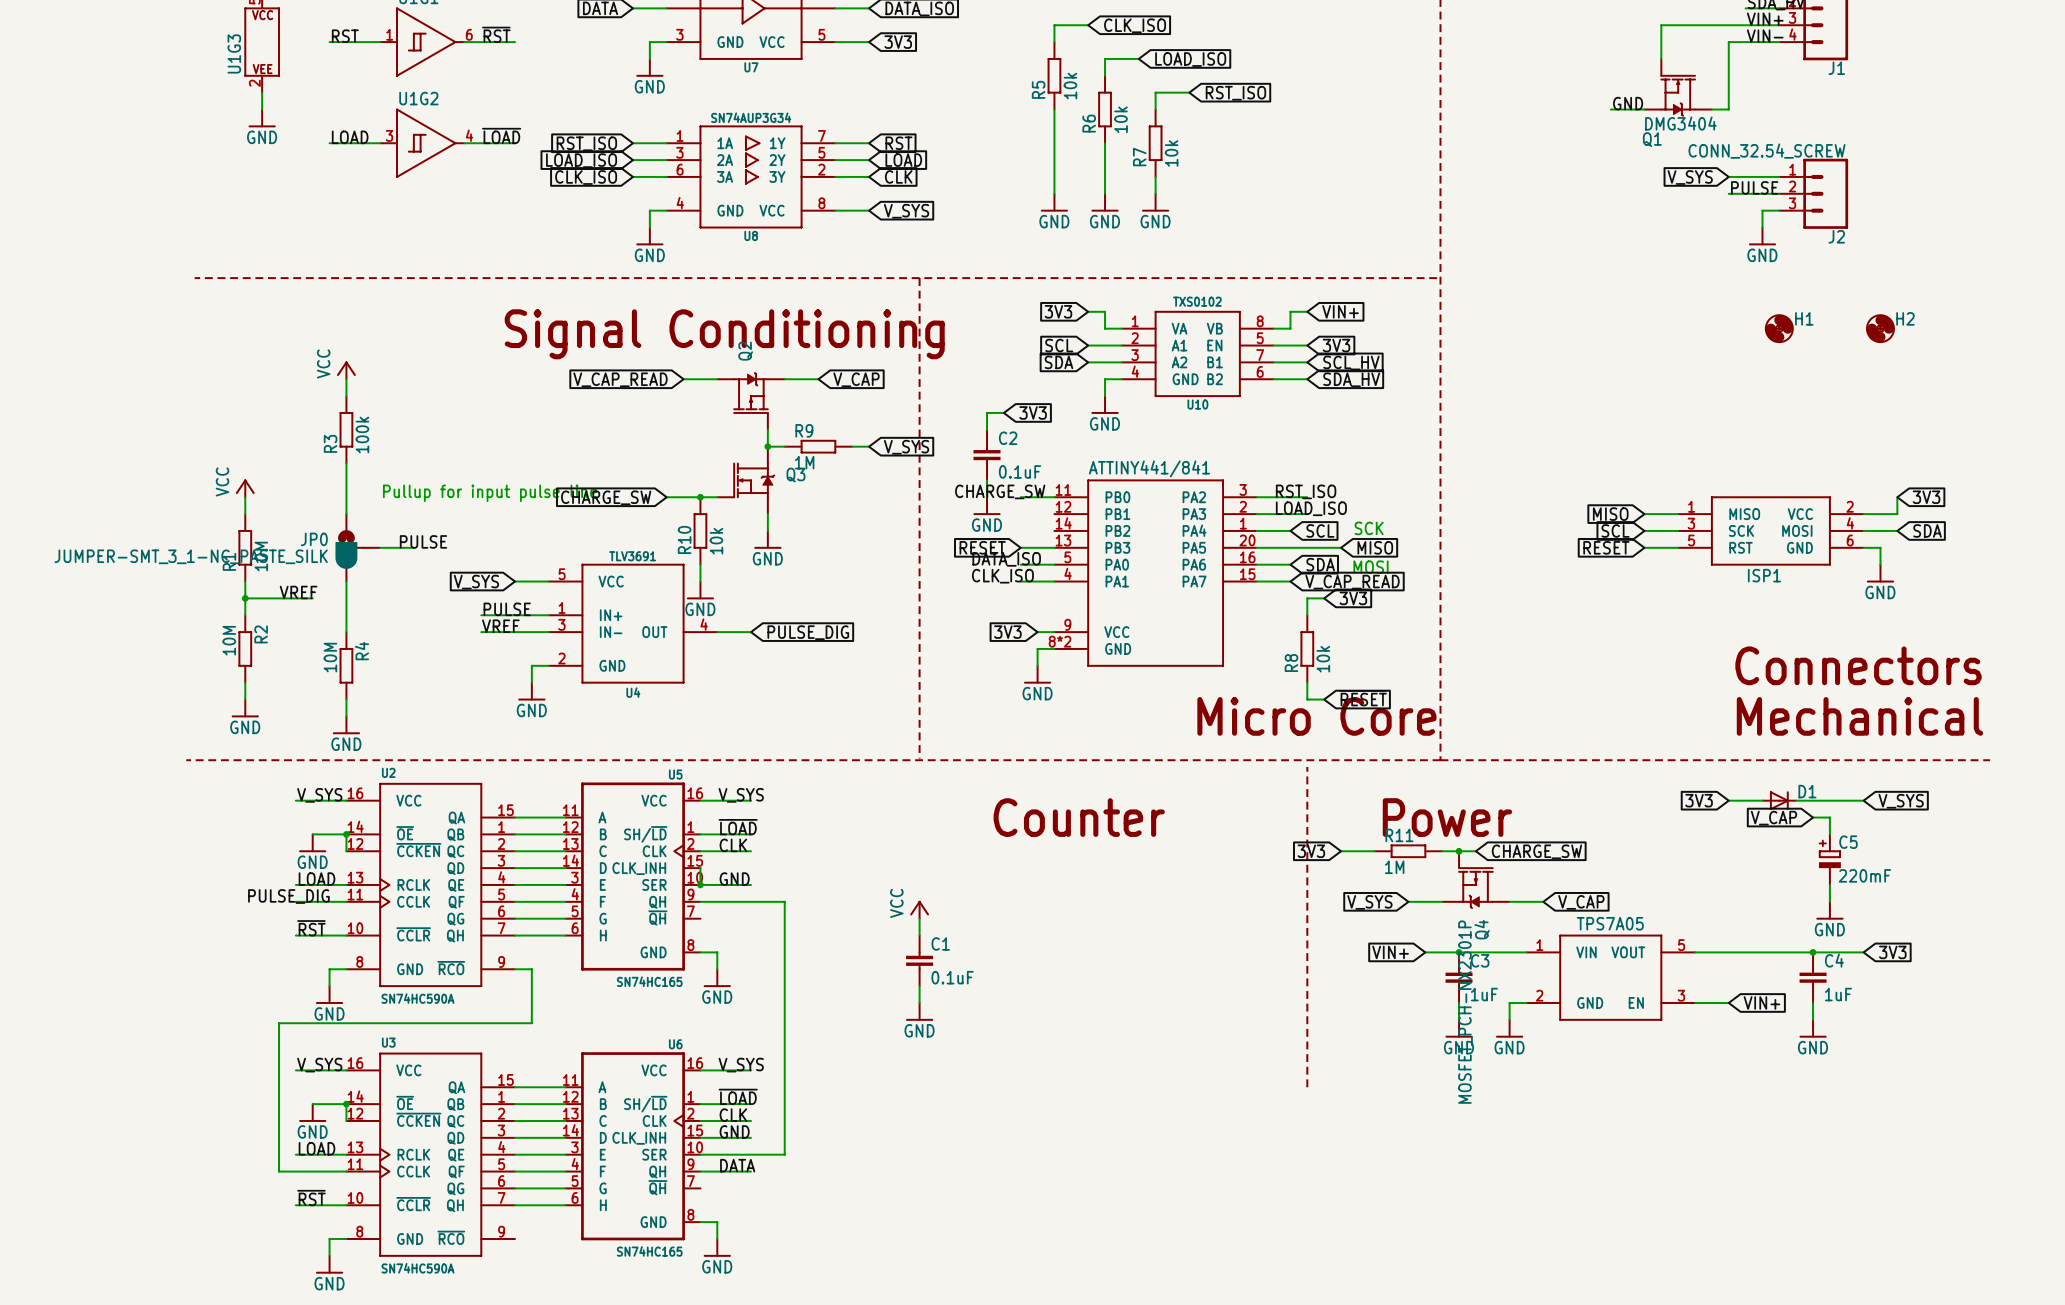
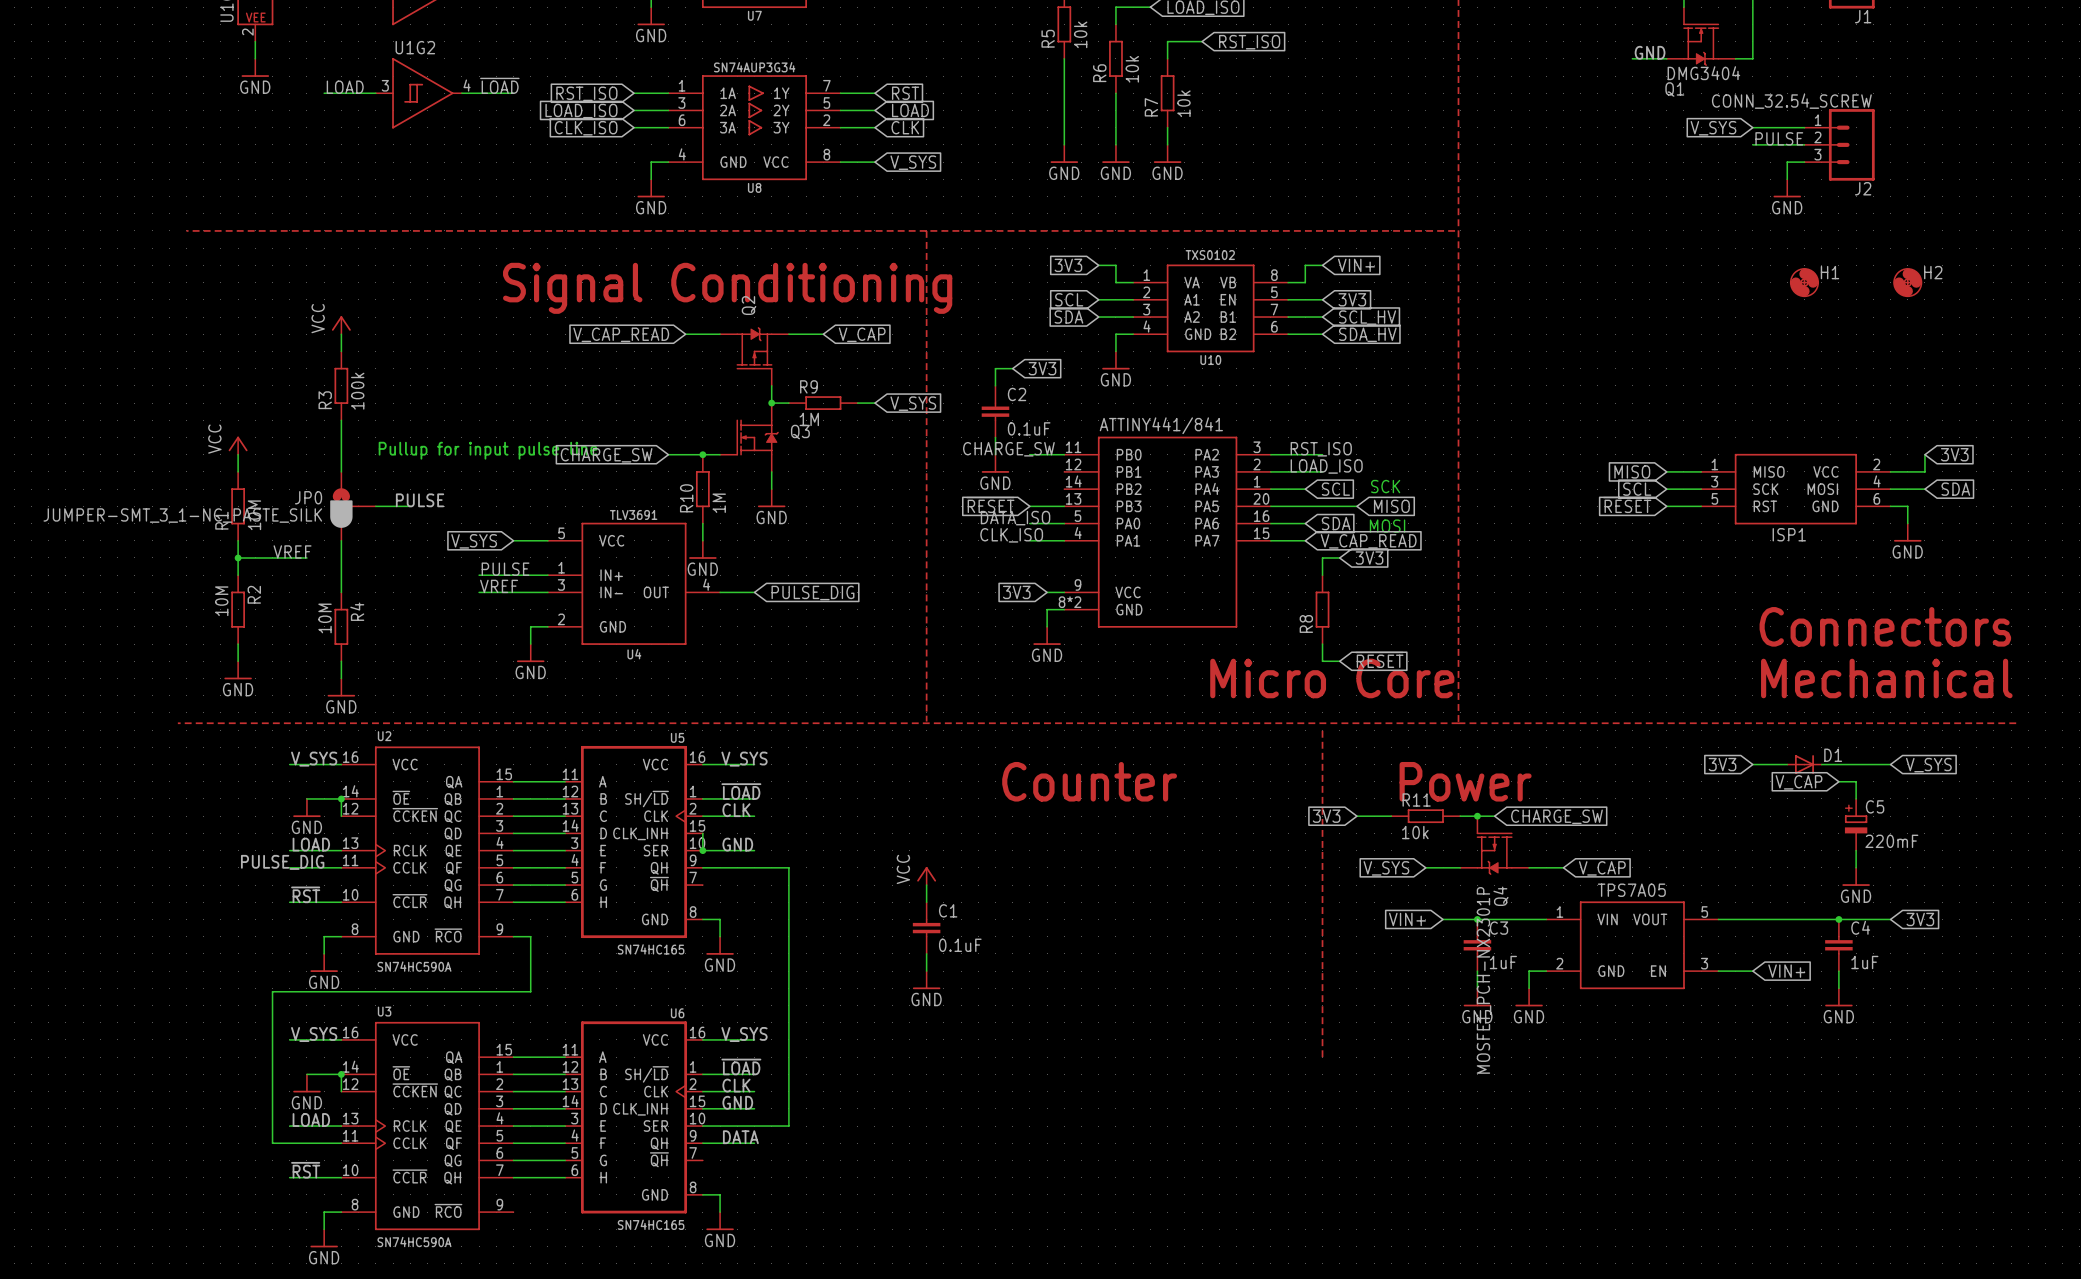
R10 value: 10k (716, 541) -> 1M (719, 503)
R8 value: 10k (1323, 659) -> none
R11 value: 1M (1394, 867) -> 10k (1415, 832)

